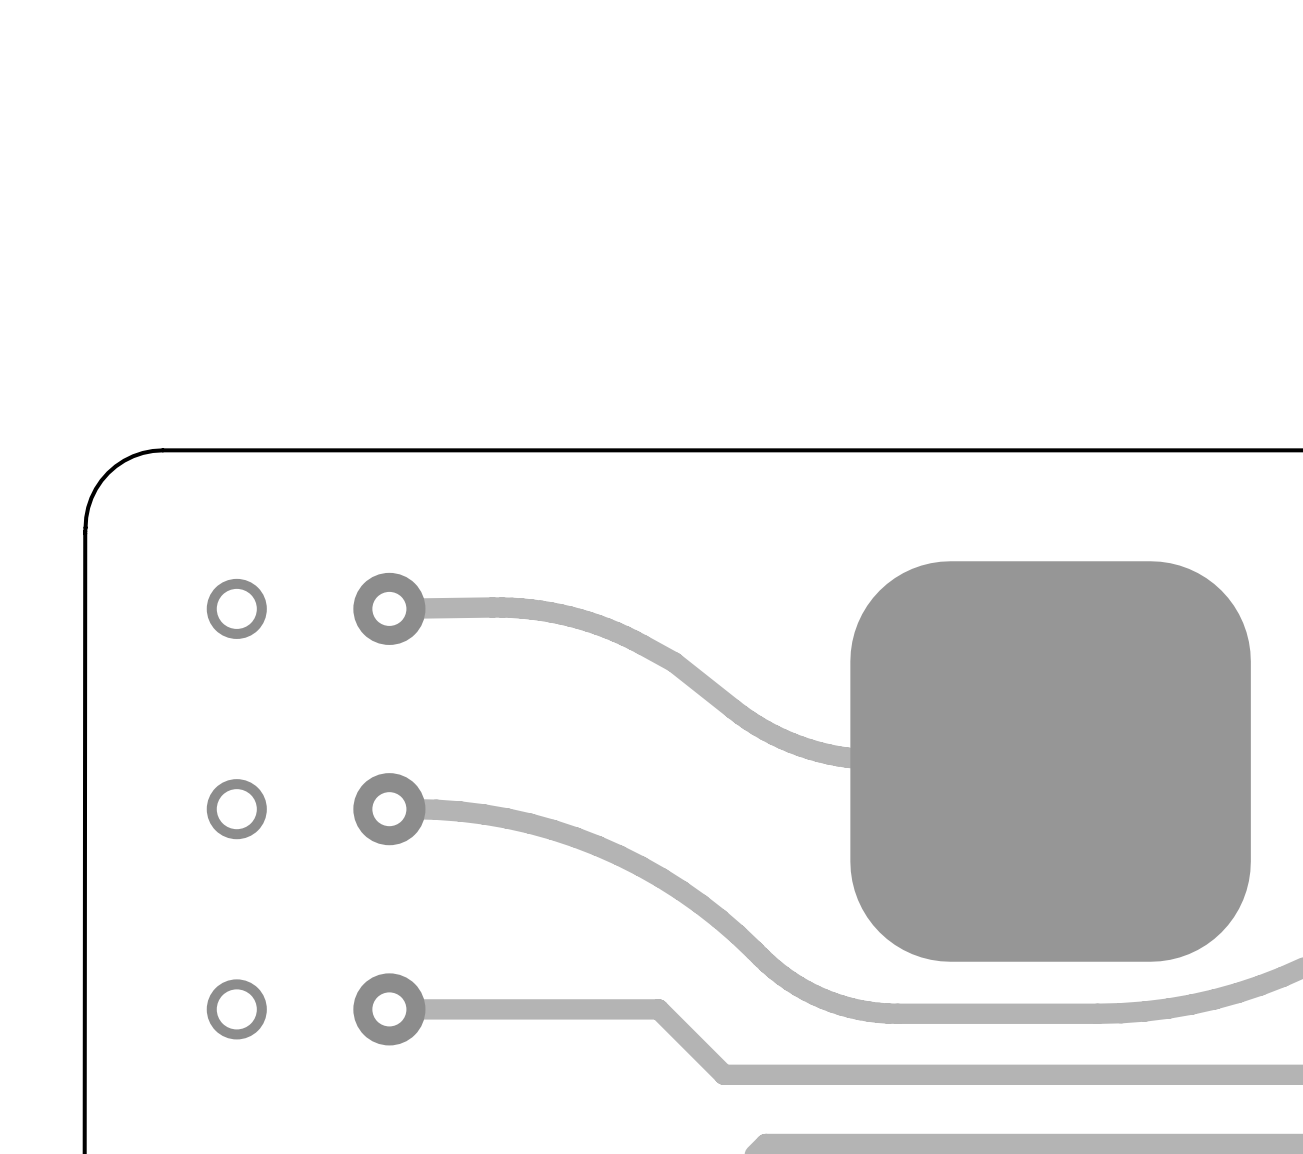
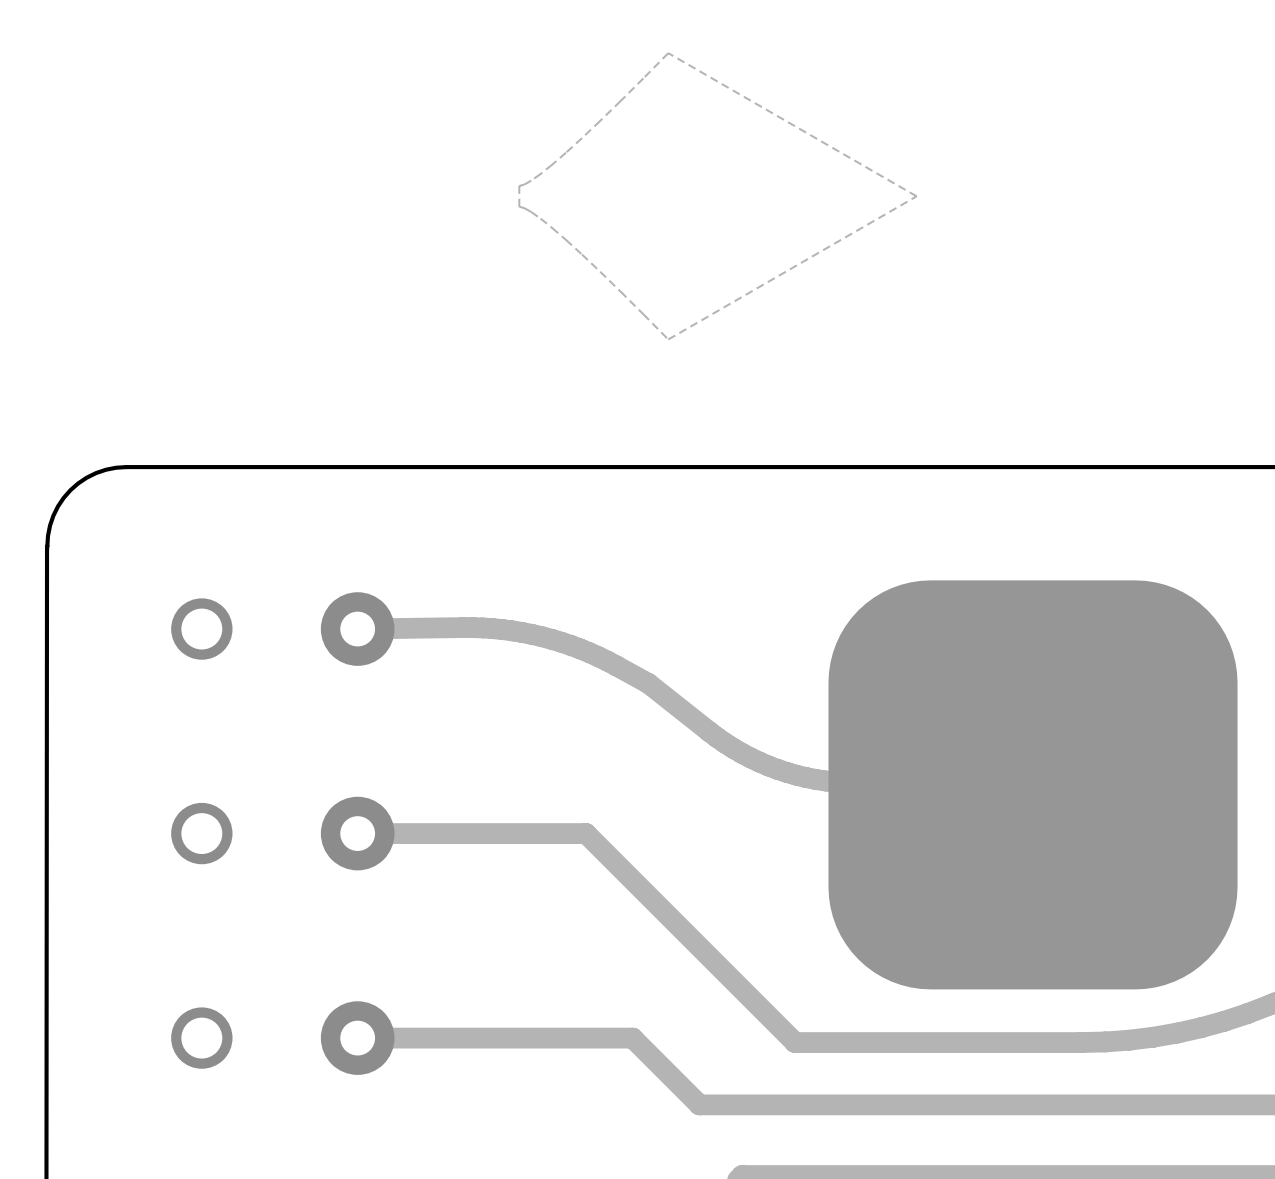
zone outline: none -> (668, 53) (916, 196) (668, 339) (565, 239) (540, 218) (519, 206) (519, 185) (540, 173) (565, 152) (668, 53)
track: (412, 809) (460, 811) (507, 818) (553, 829) (597, 845) (640, 866) (681, 890) (719, 918) (754, 950) -> (381, 833) (586, 833) (730, 978)
track: (761, 957) (790, 981) (823, 999) (860, 1010) (897, 1013) -> (737, 984) (795, 1042) (876, 1042)

